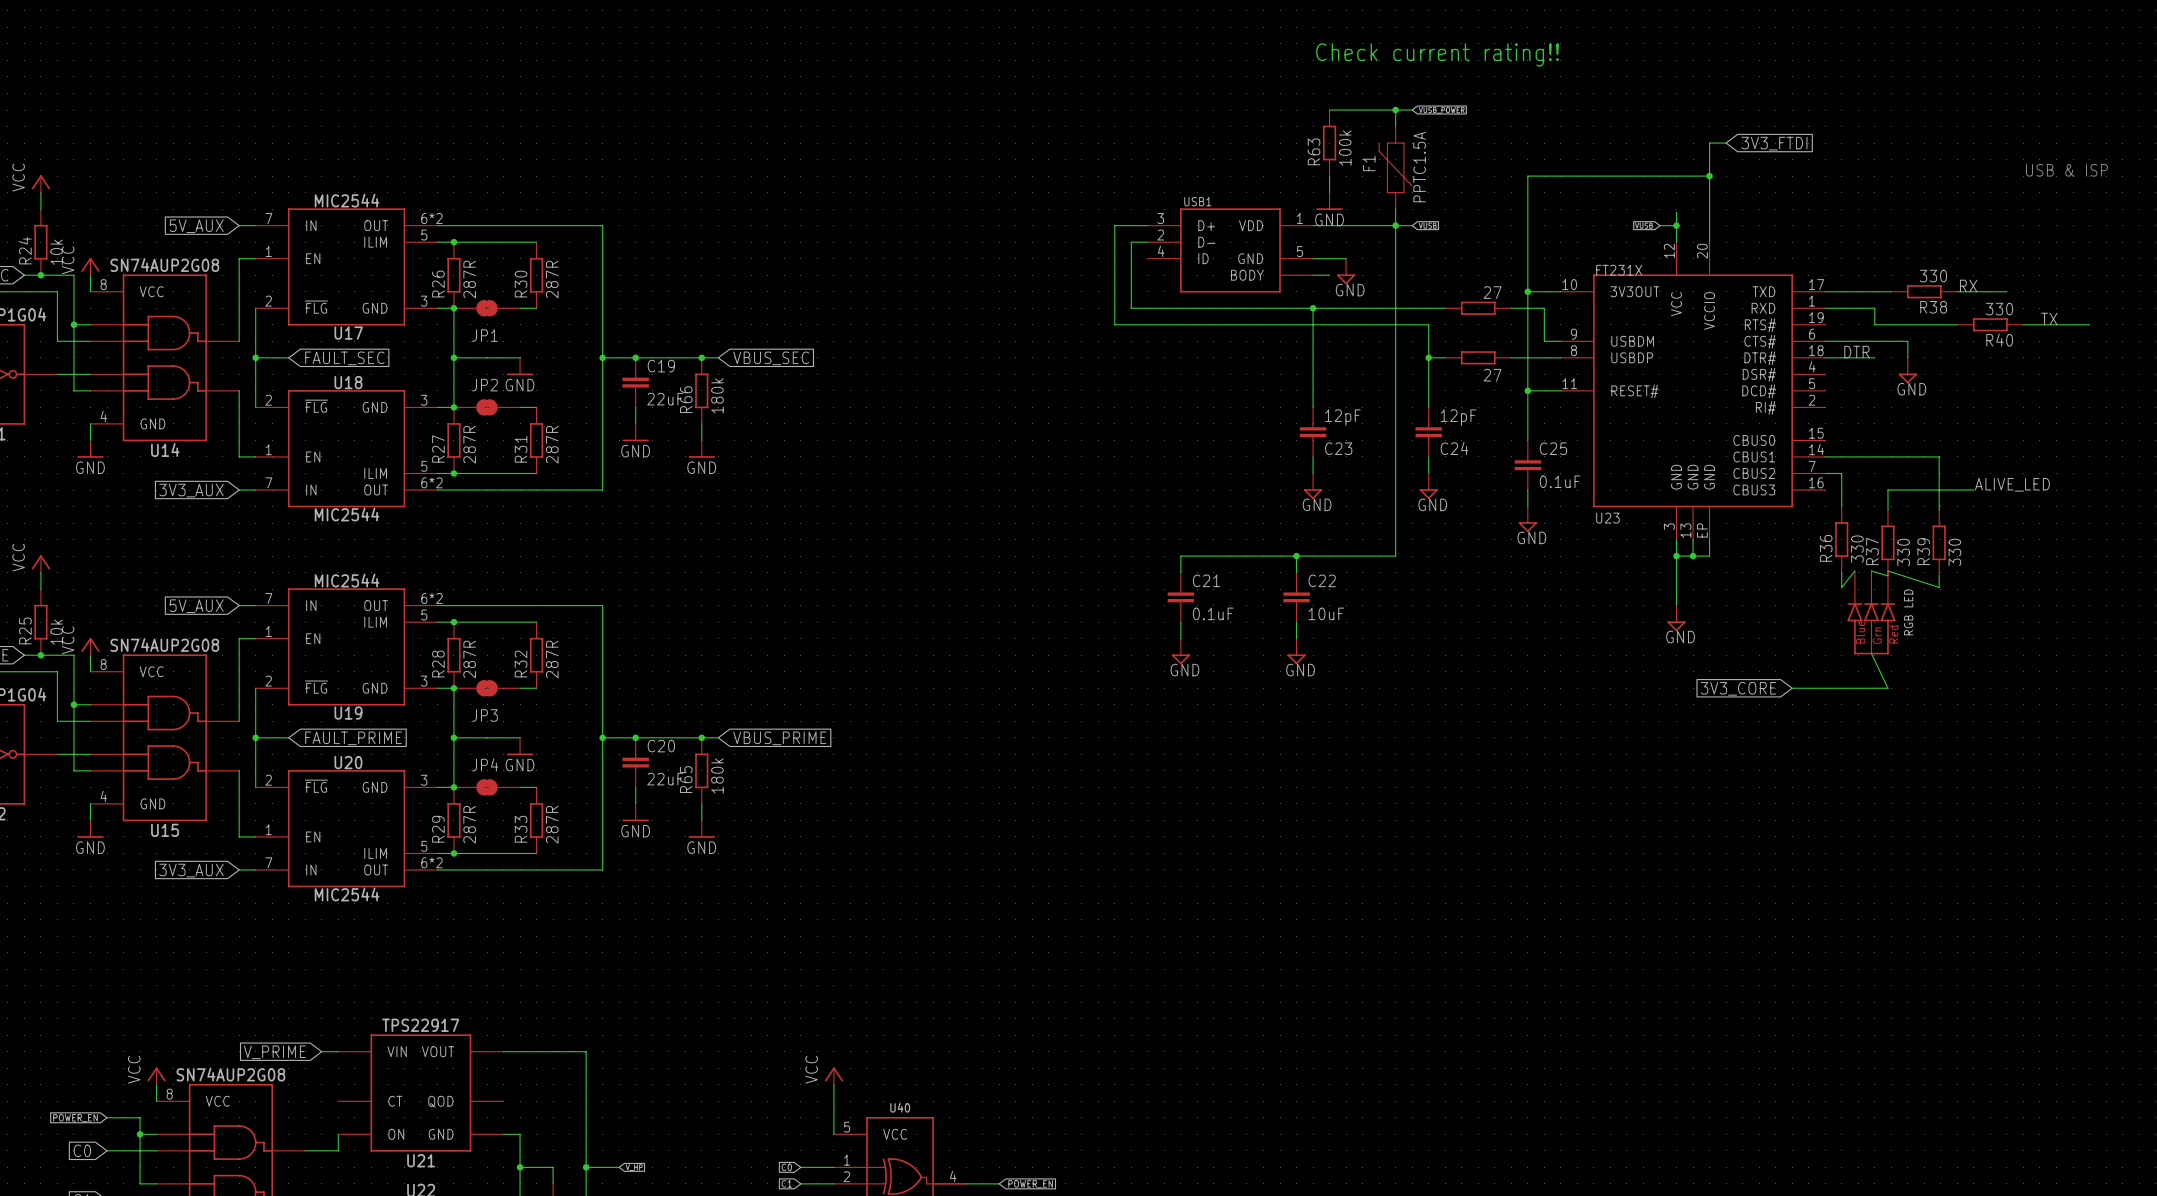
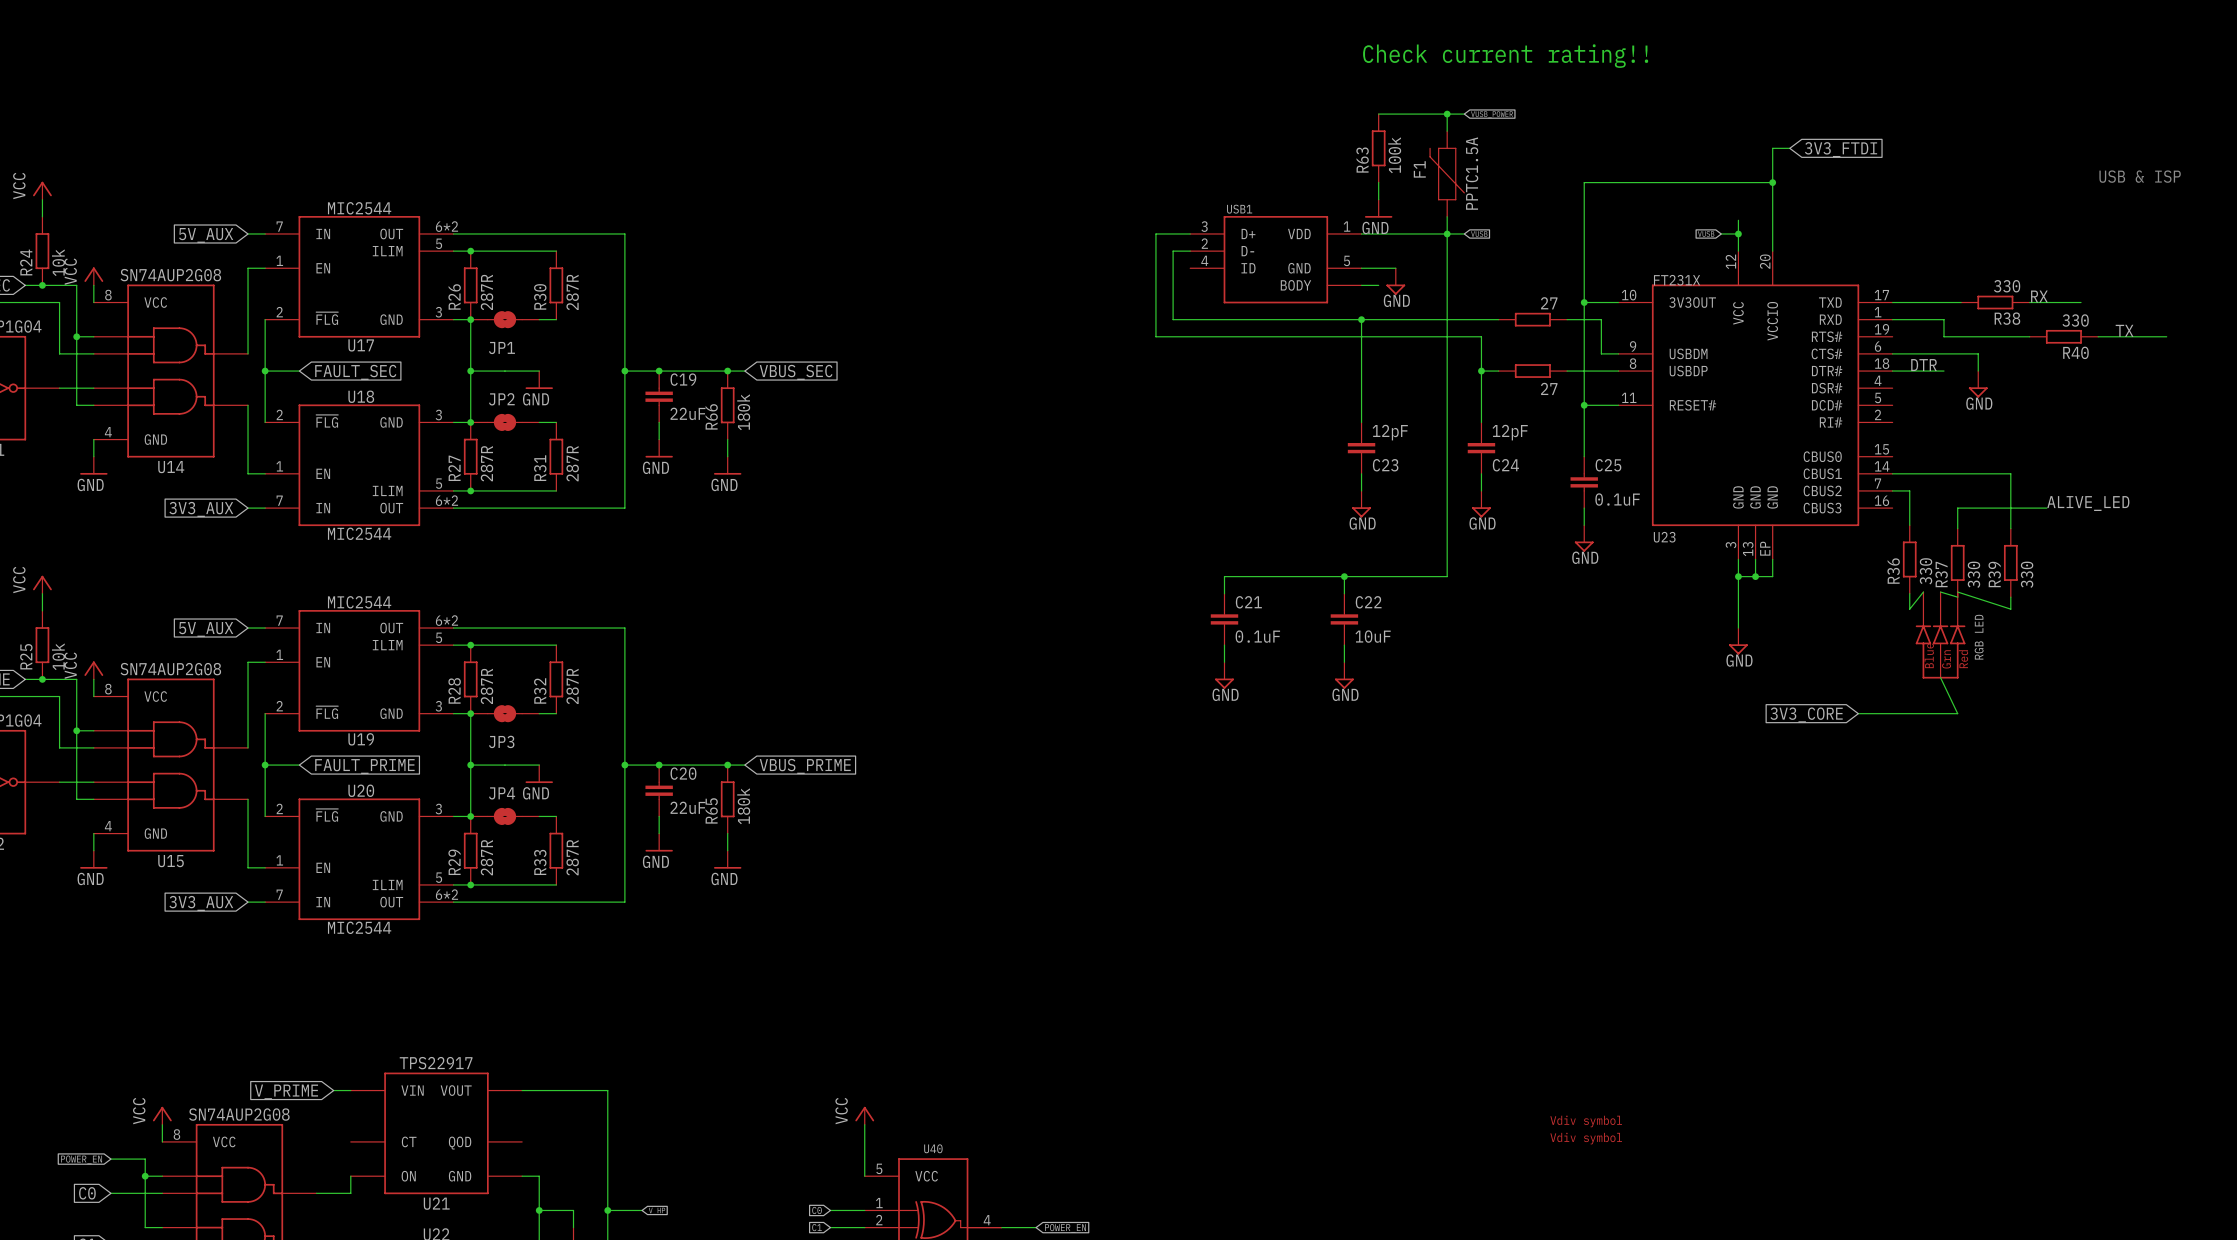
part: none -> (1586, 1121)
part: none -> (1586, 1138)

